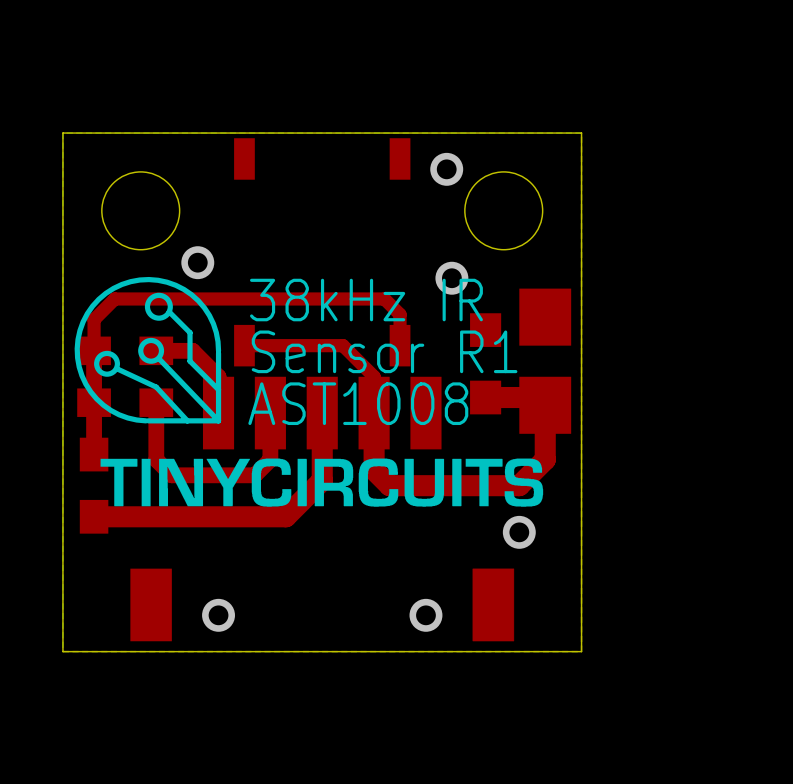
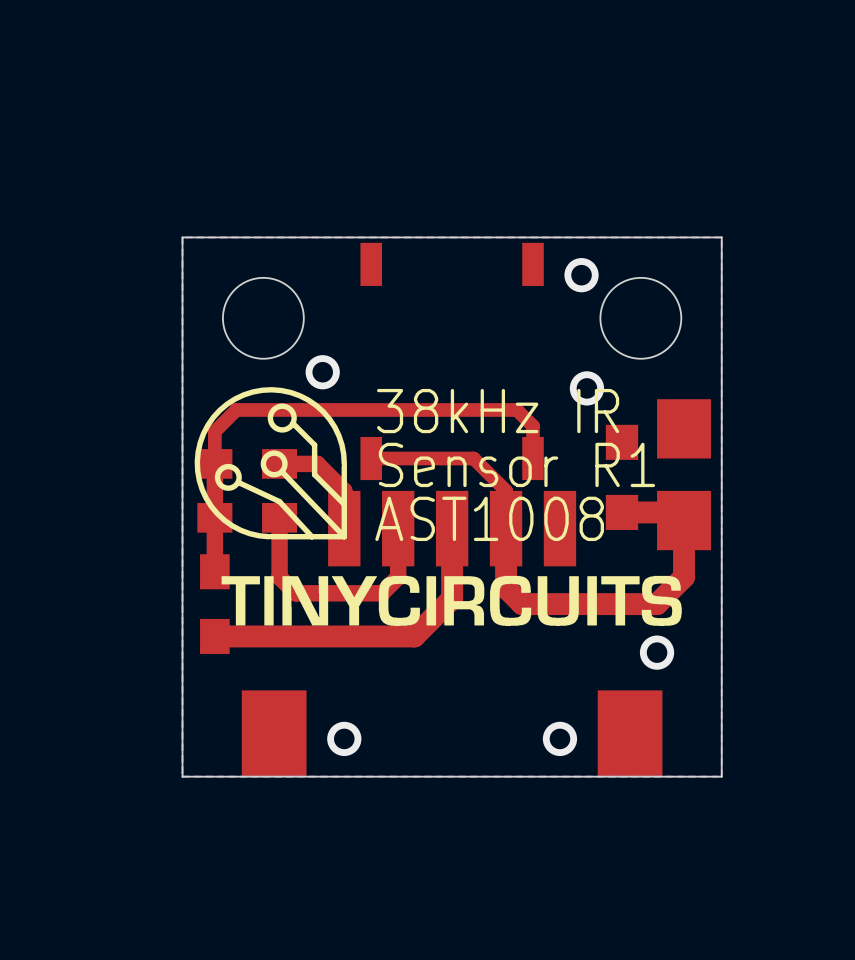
part footprint: [130, 376, 515, 642] -> [241, 490, 663, 777]

